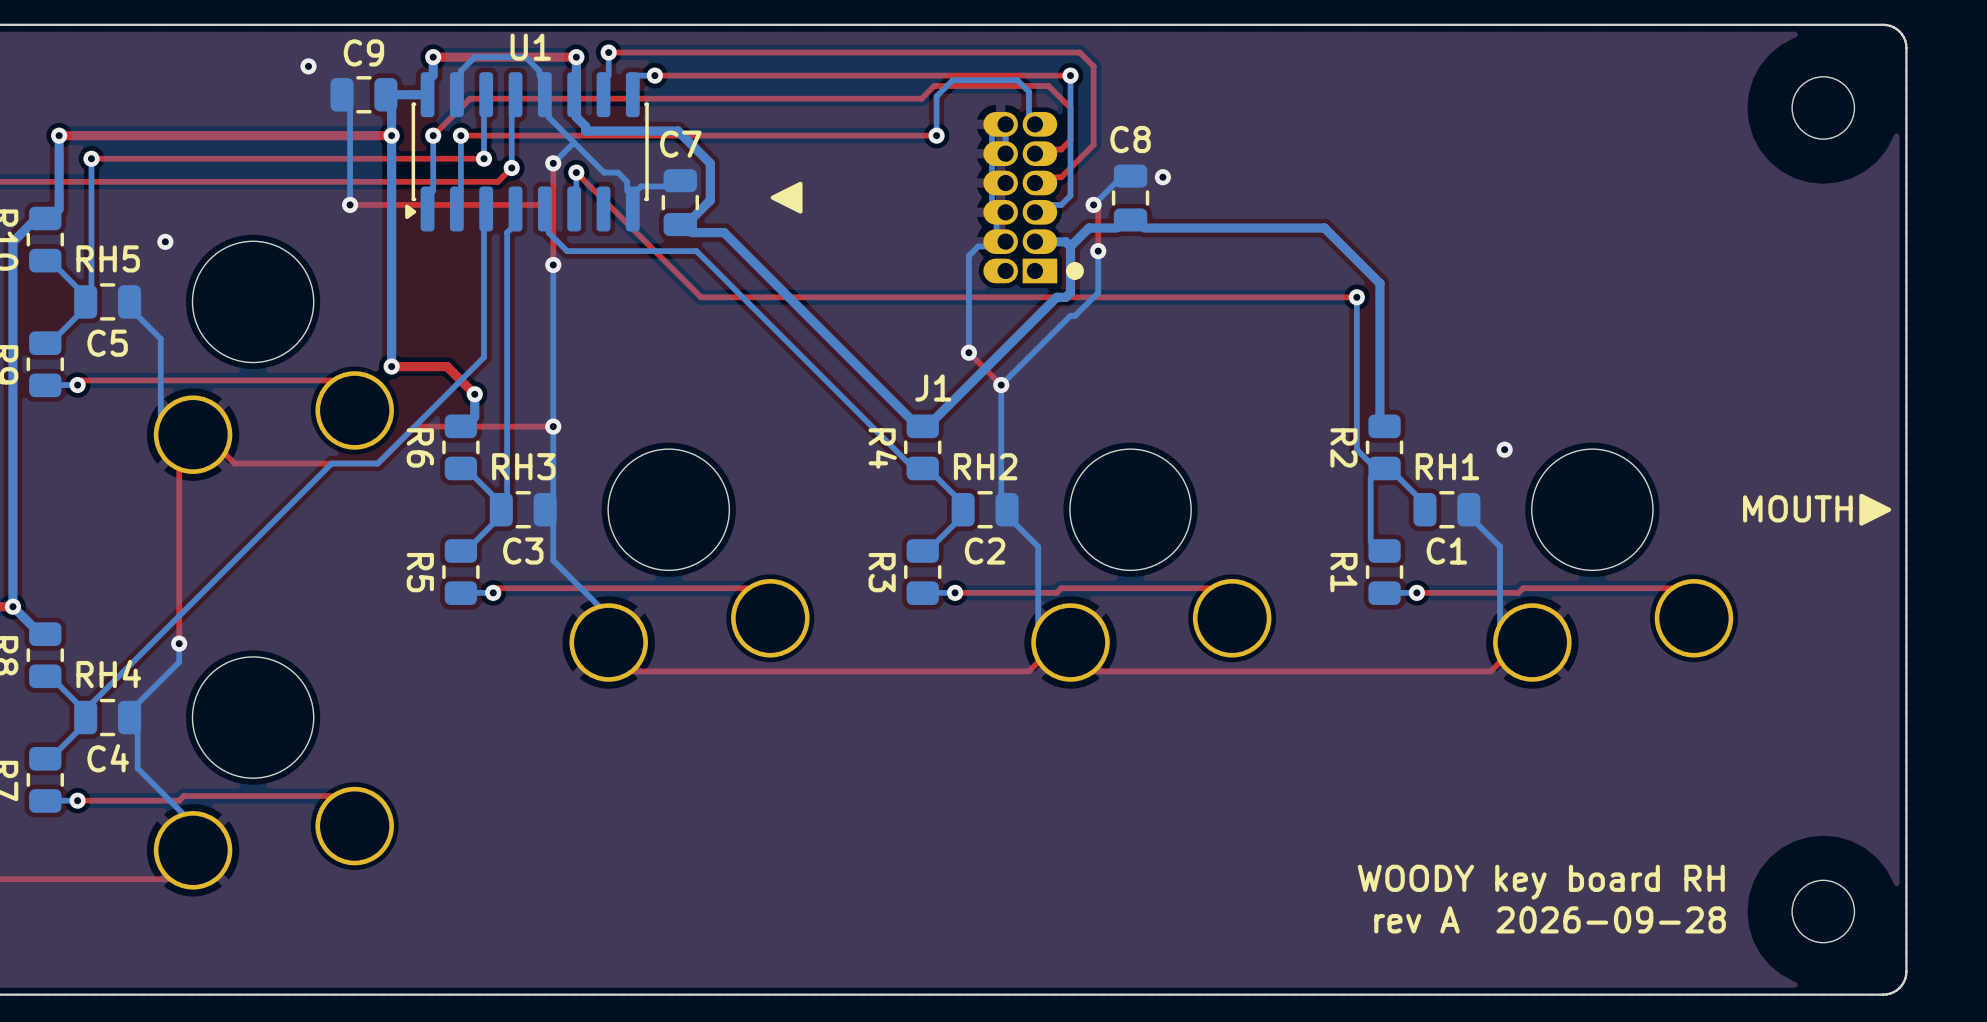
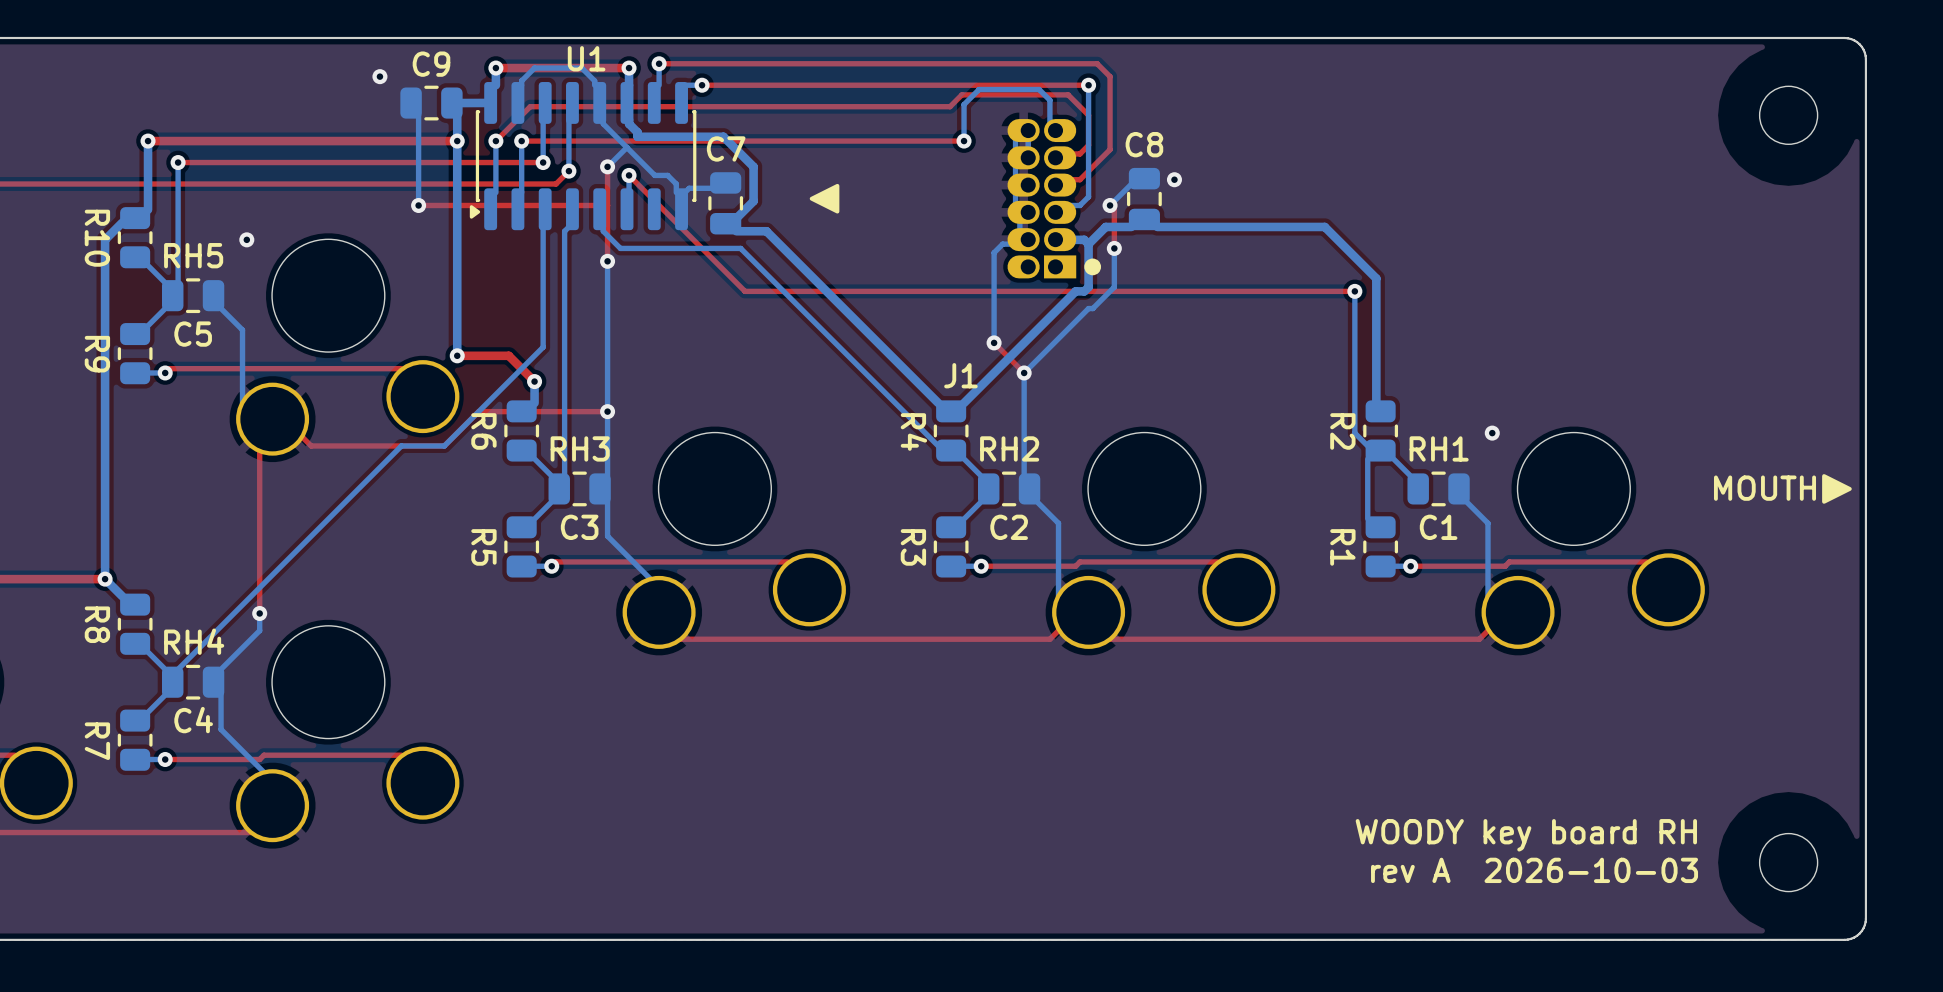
text: rev A 2026-09-28 (1550, 919) -> rev A 2026-10-03 (1534, 870)

